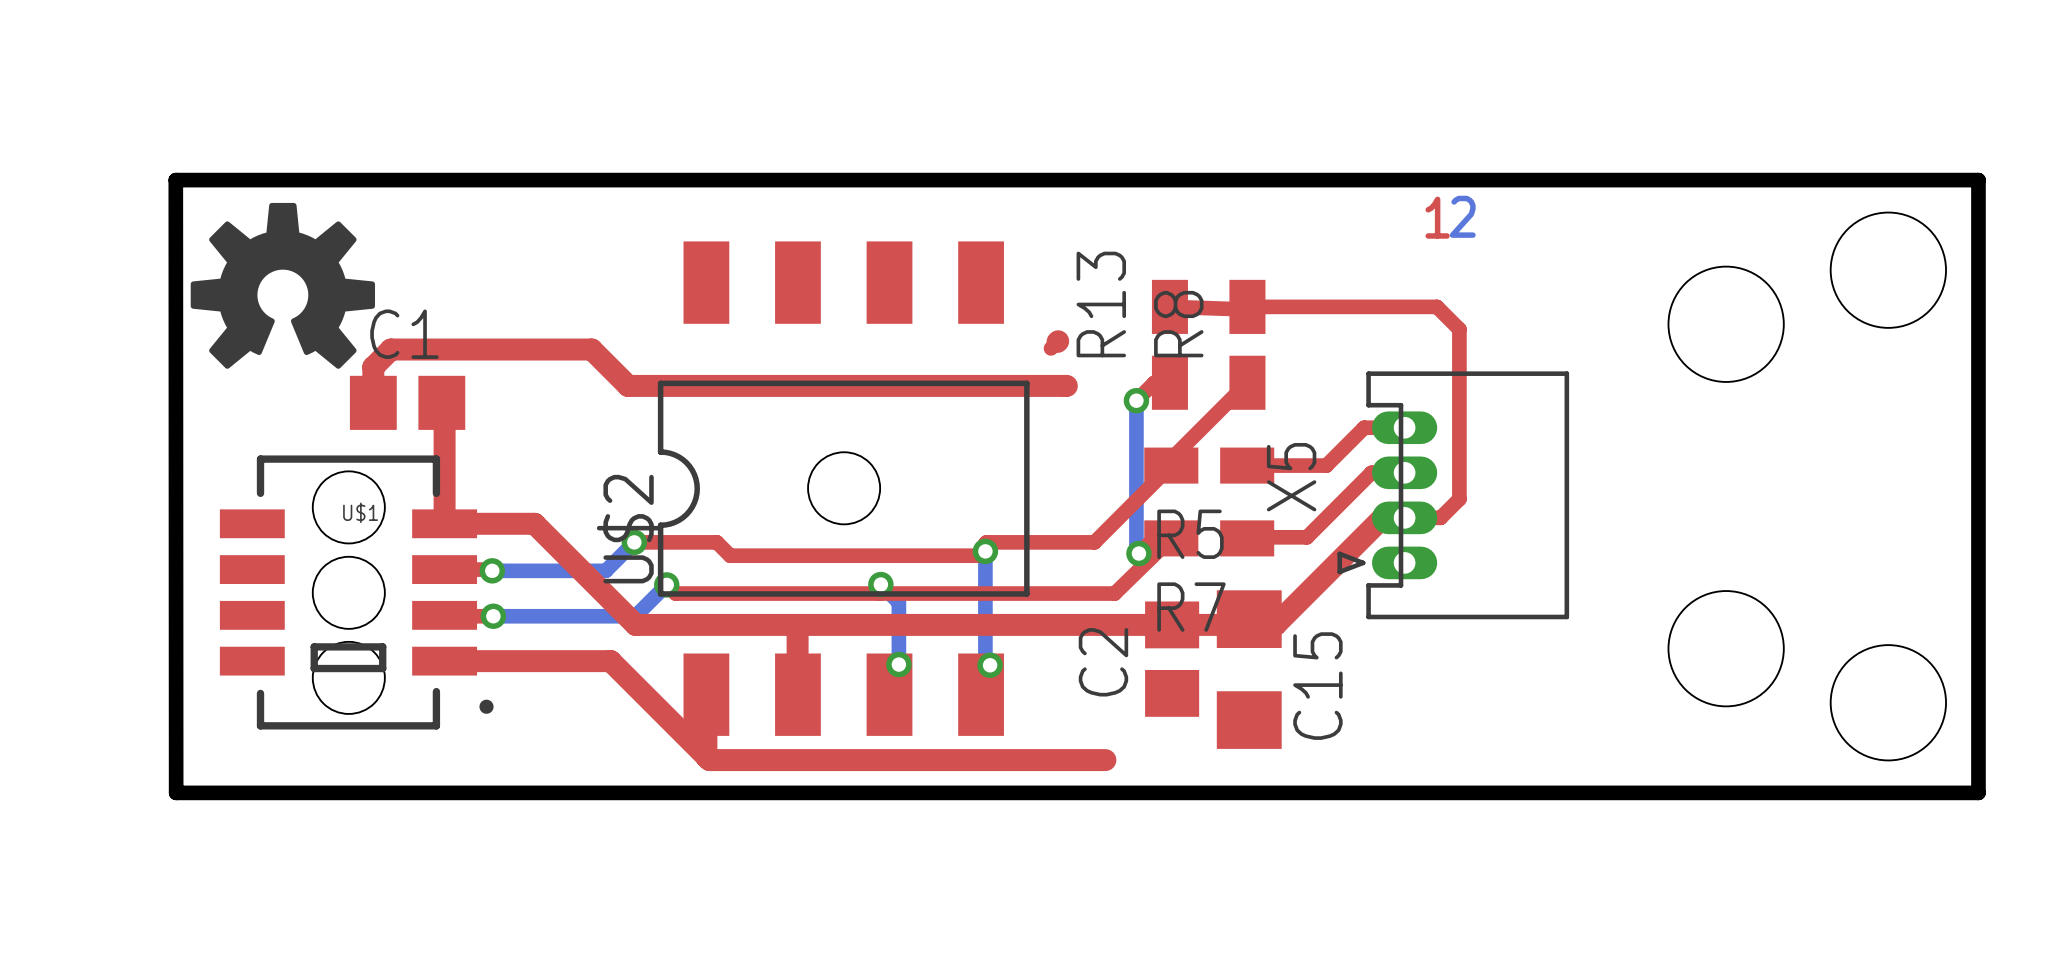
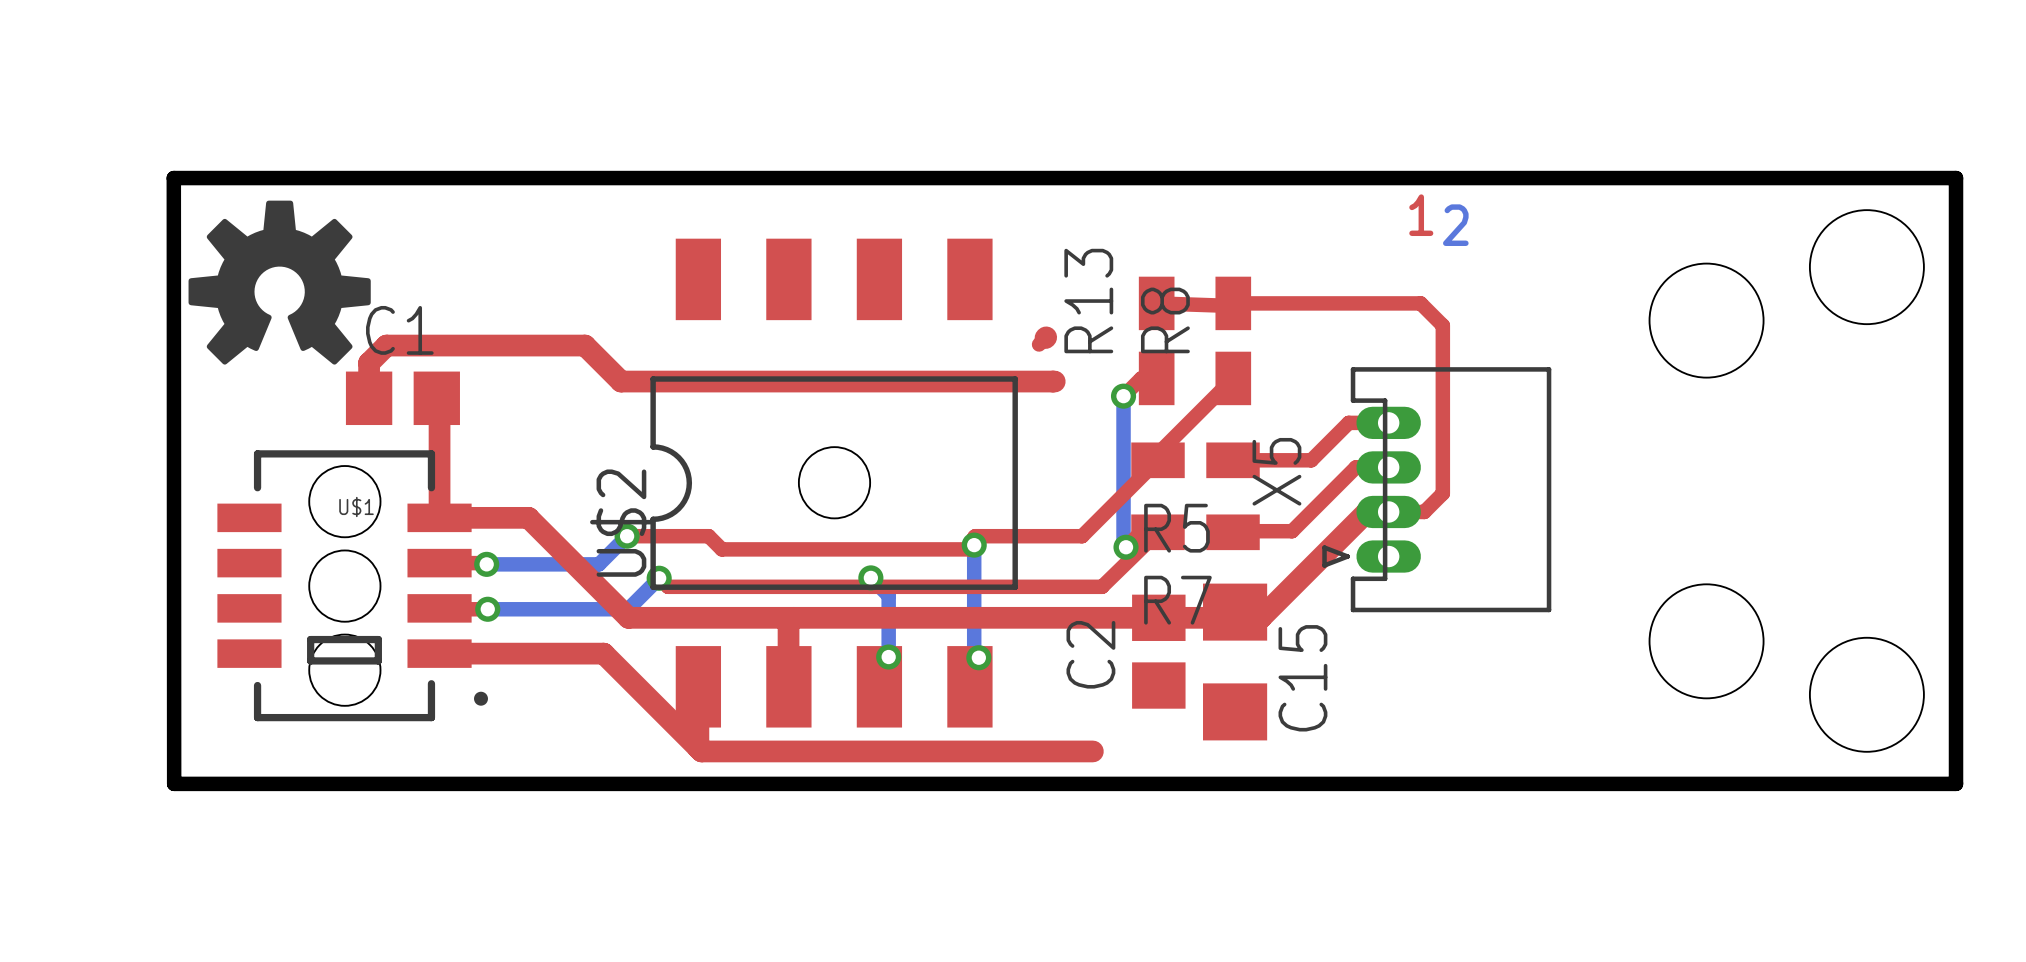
text position: 2 (1462, 216) -> 2 (1455, 225)

